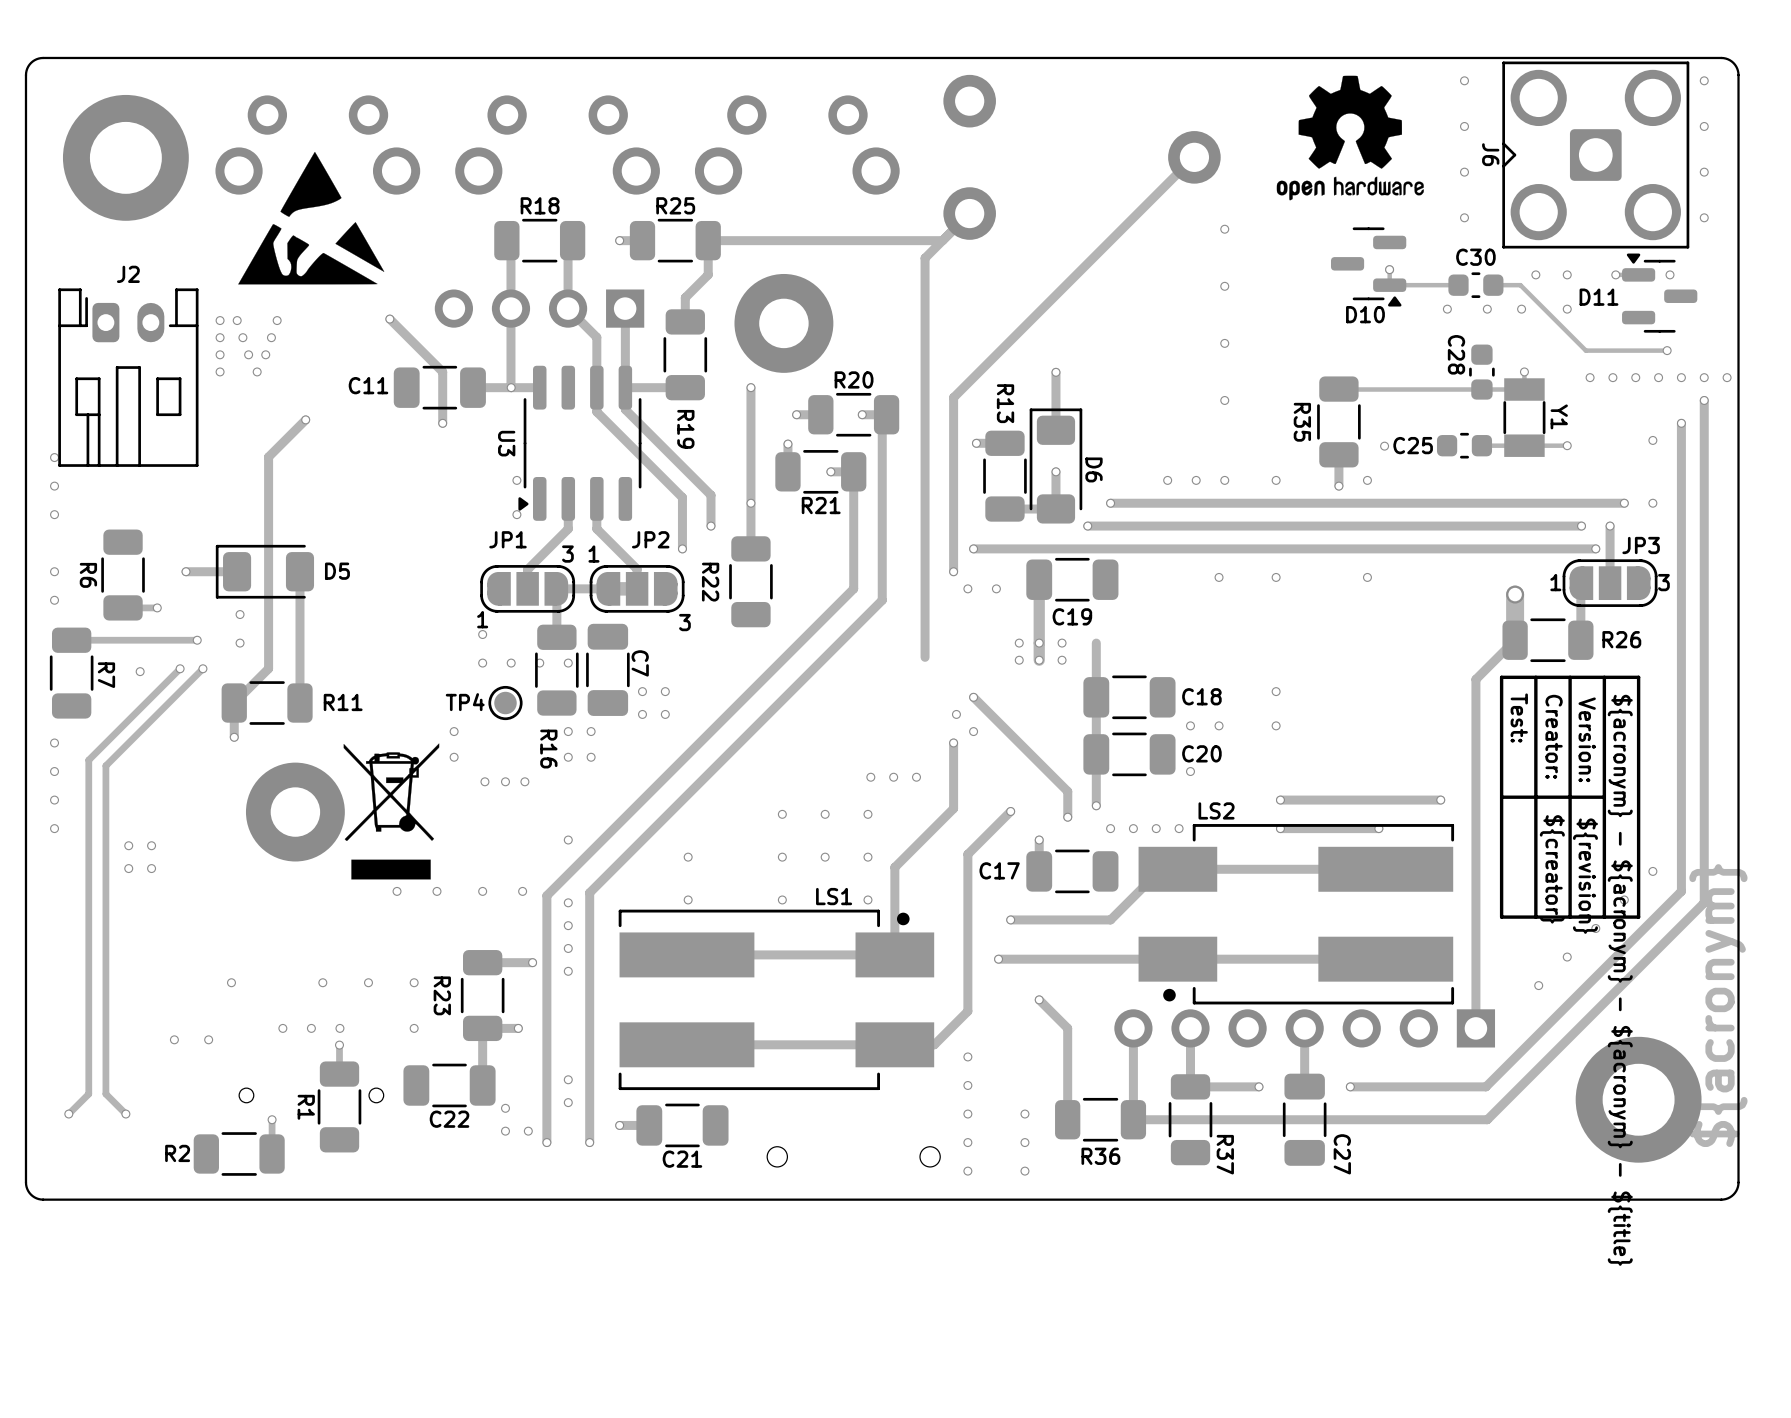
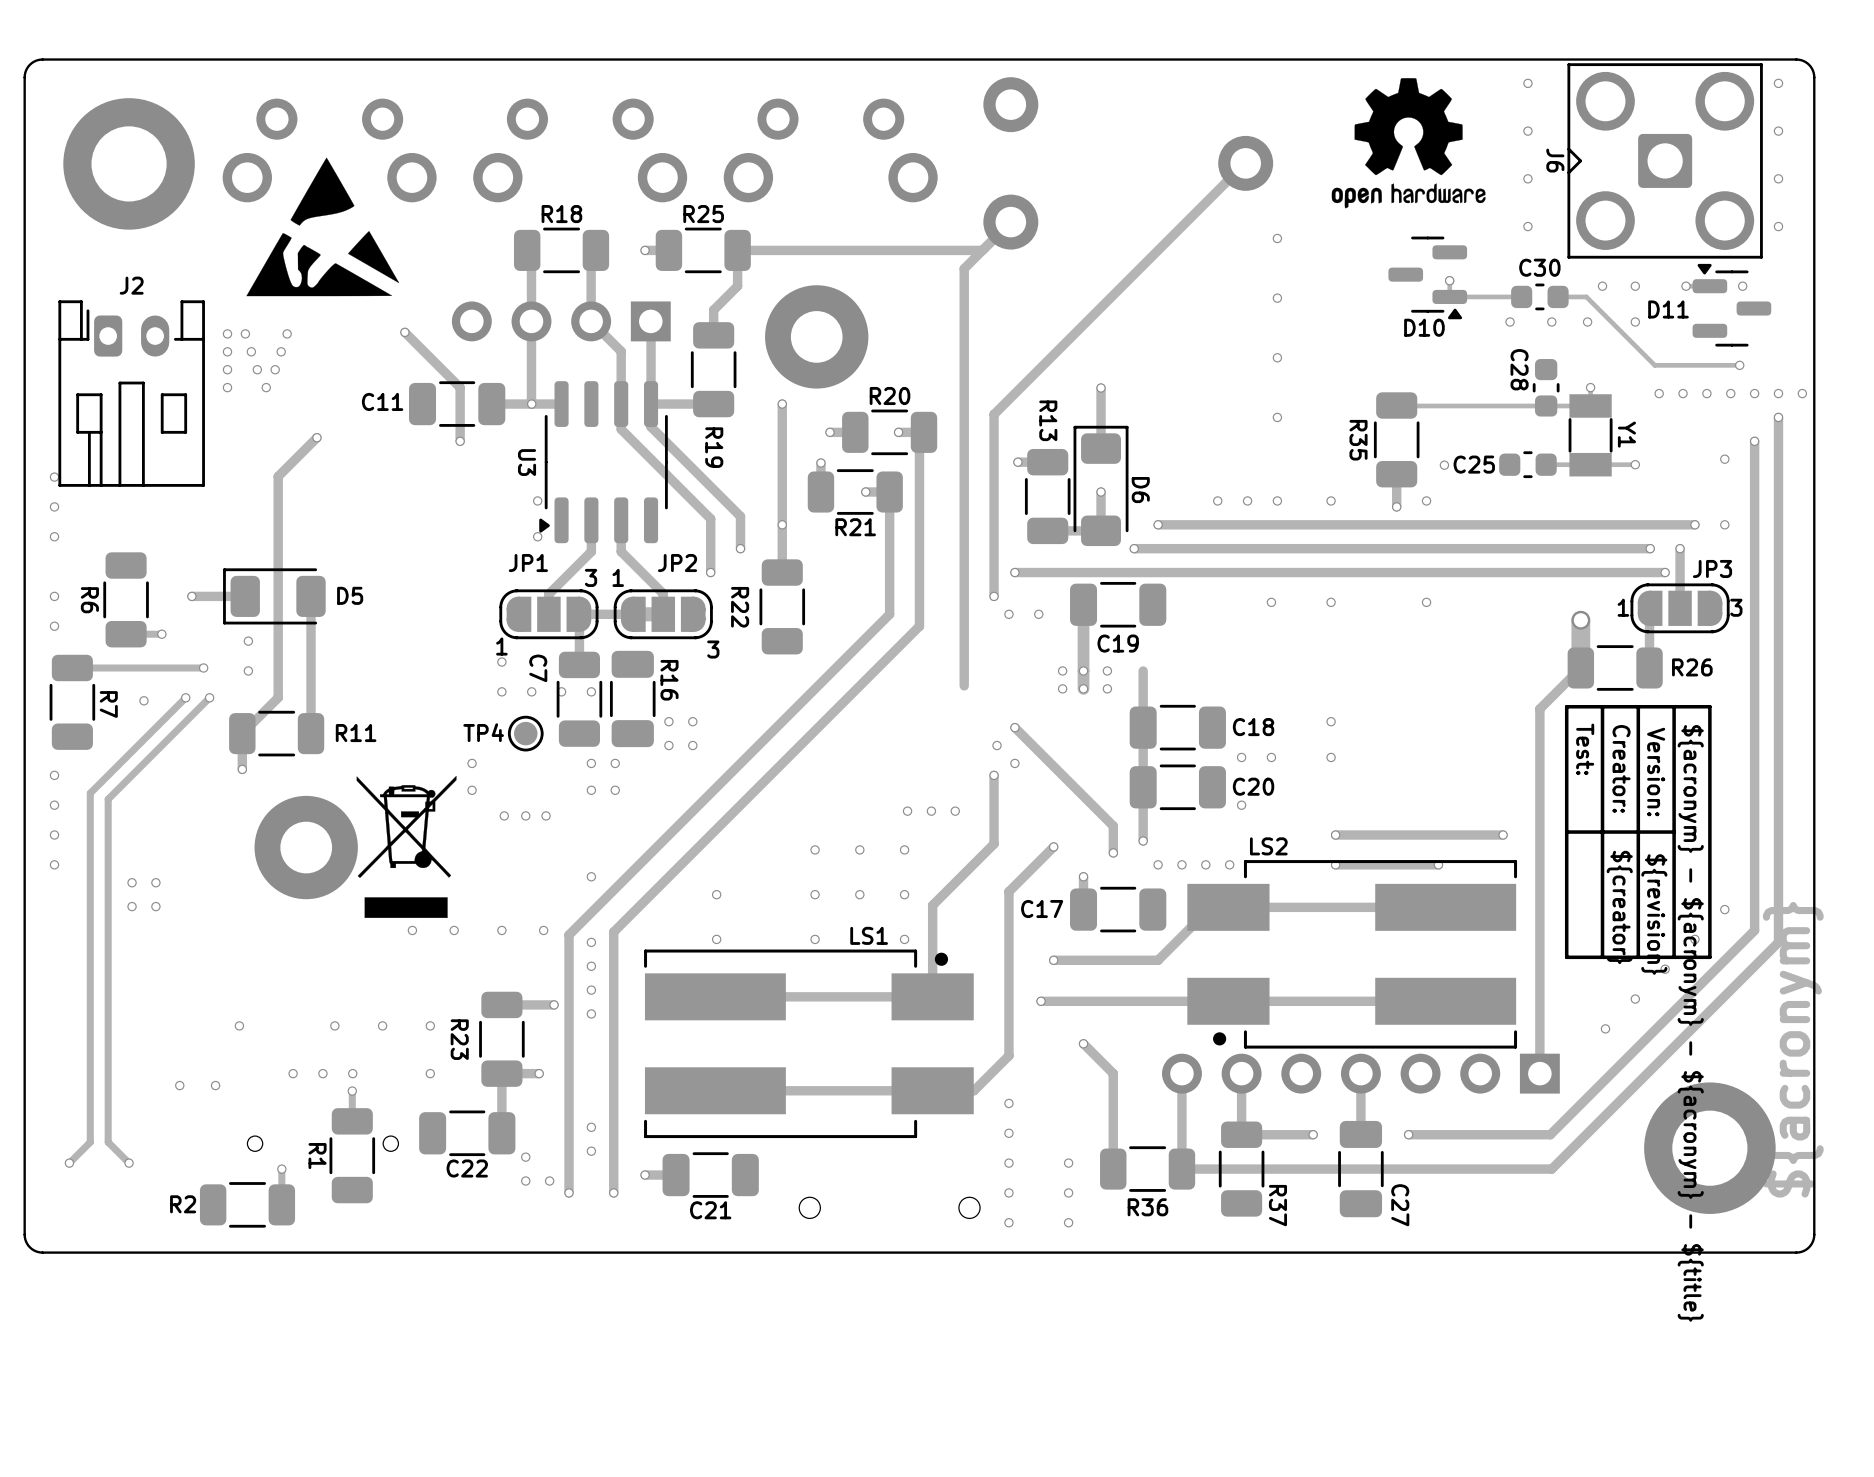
C7 name position: C7 (640, 663) -> C7 (538, 668)
R16 name position: R16 (548, 749) -> R16 (669, 680)

